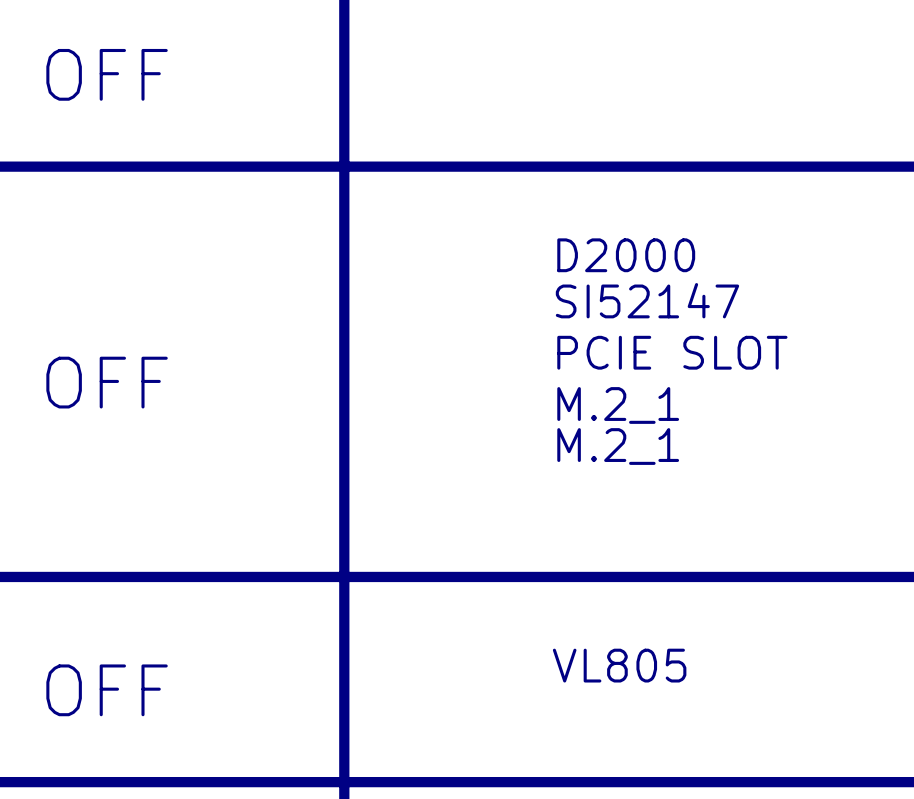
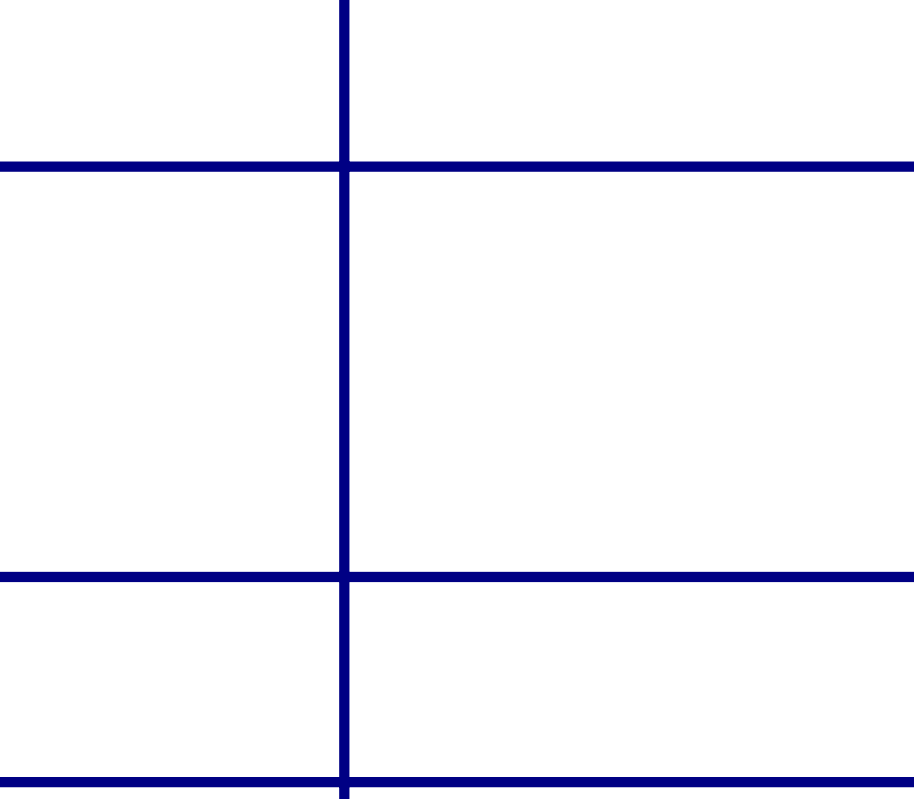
text: OFF (107, 74) -> none
text: D2000 (626, 255) -> none
text: SI52147 (647, 300) -> none
text: PCIE SLOT (672, 352) -> none
text: OFF (107, 382) -> none
text: M.2_1 (618, 405) -> none
text: M.2_1 (618, 446) -> none
text: VL805 (619, 665) -> none
text: OFF (107, 690) -> none

